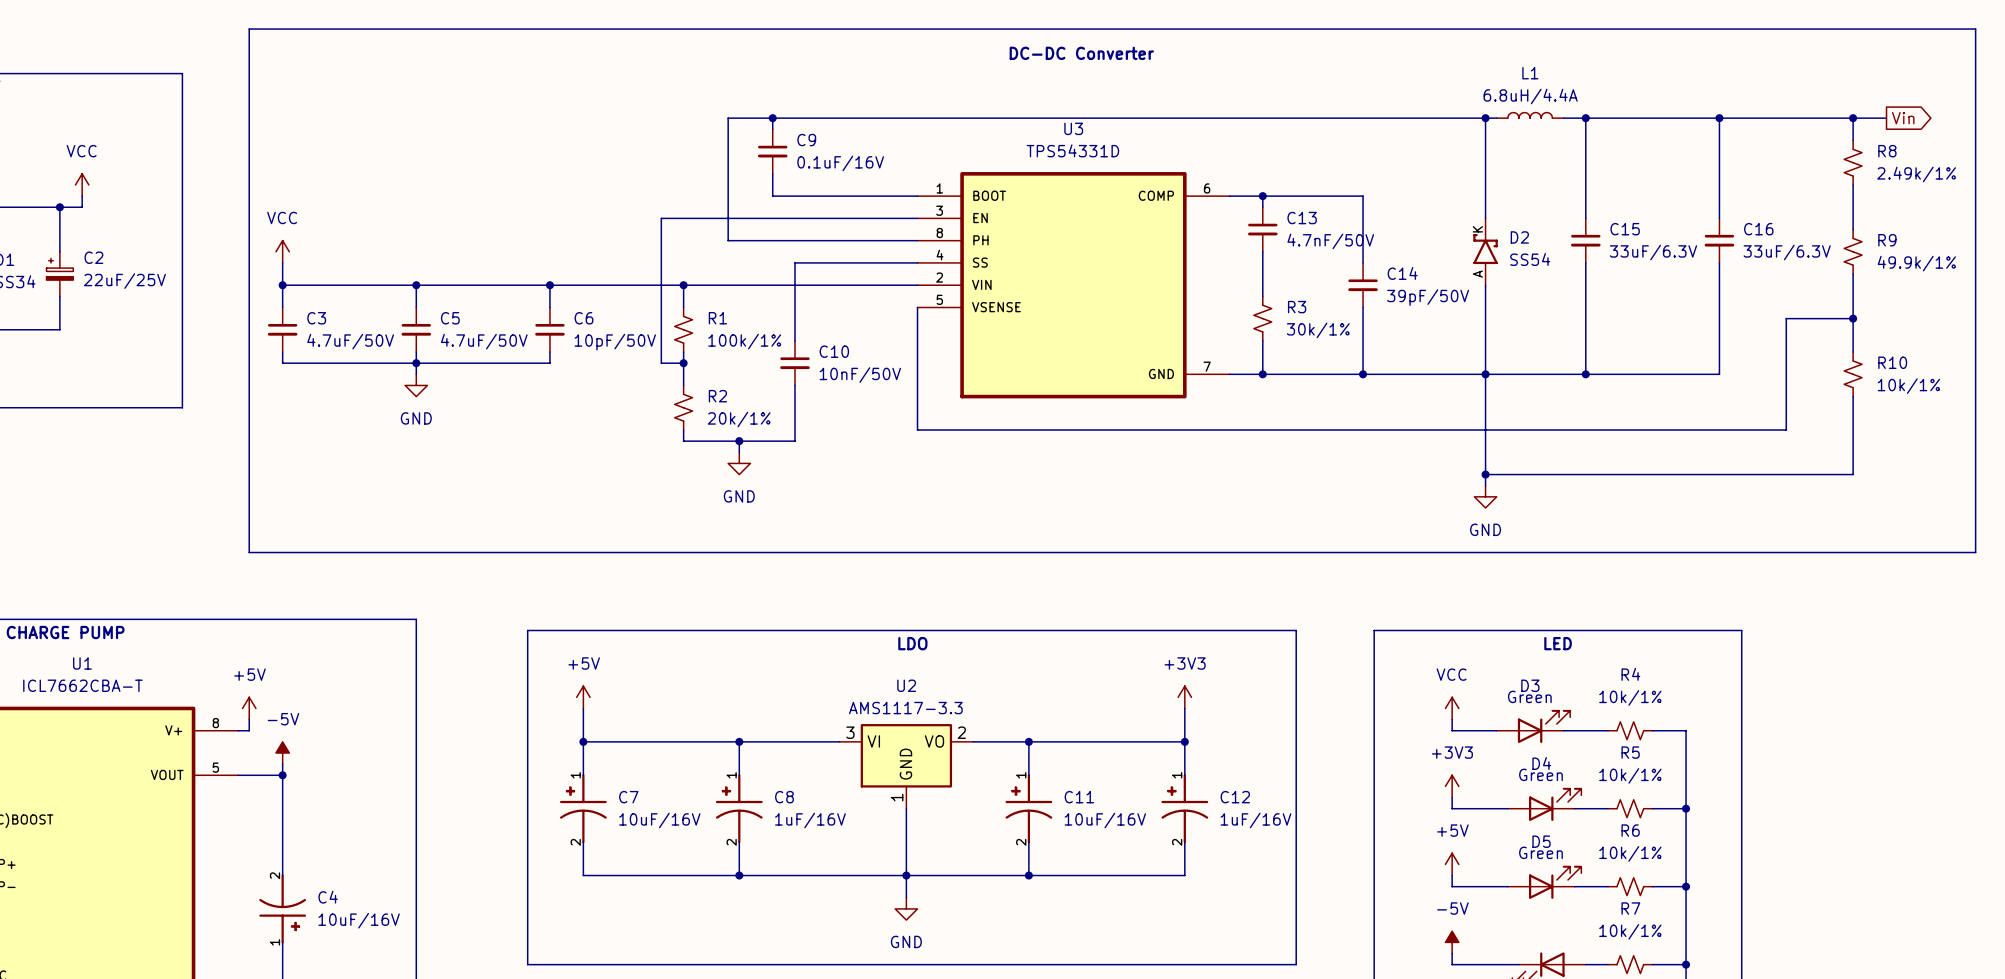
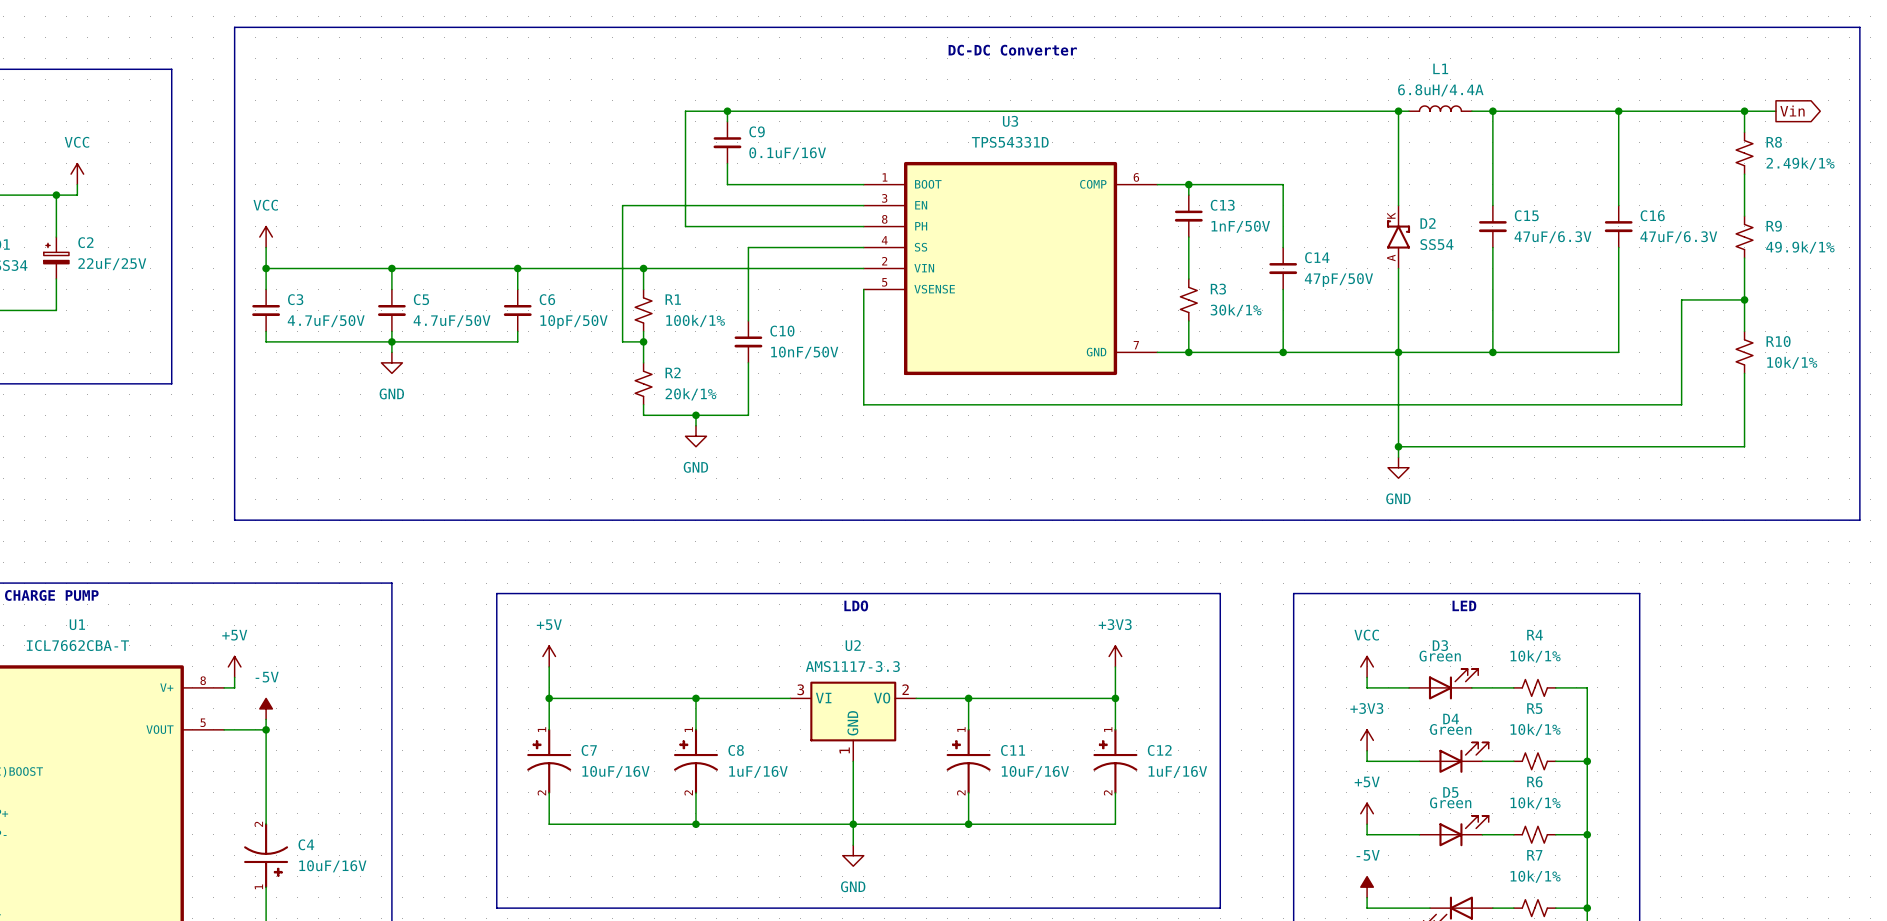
C13 value: 4.7nF/50V (1330, 241) -> 1nF/50V (1240, 226)
C15 value: 33uF/6.3V (1653, 252) -> 47uF/6.3V (1552, 237)
C16 value: 33uF/6.3V (1787, 252) -> 47uF/6.3V (1678, 237)
C14 value: 39pF/50V (1428, 297) -> 47pF/50V (1338, 280)

